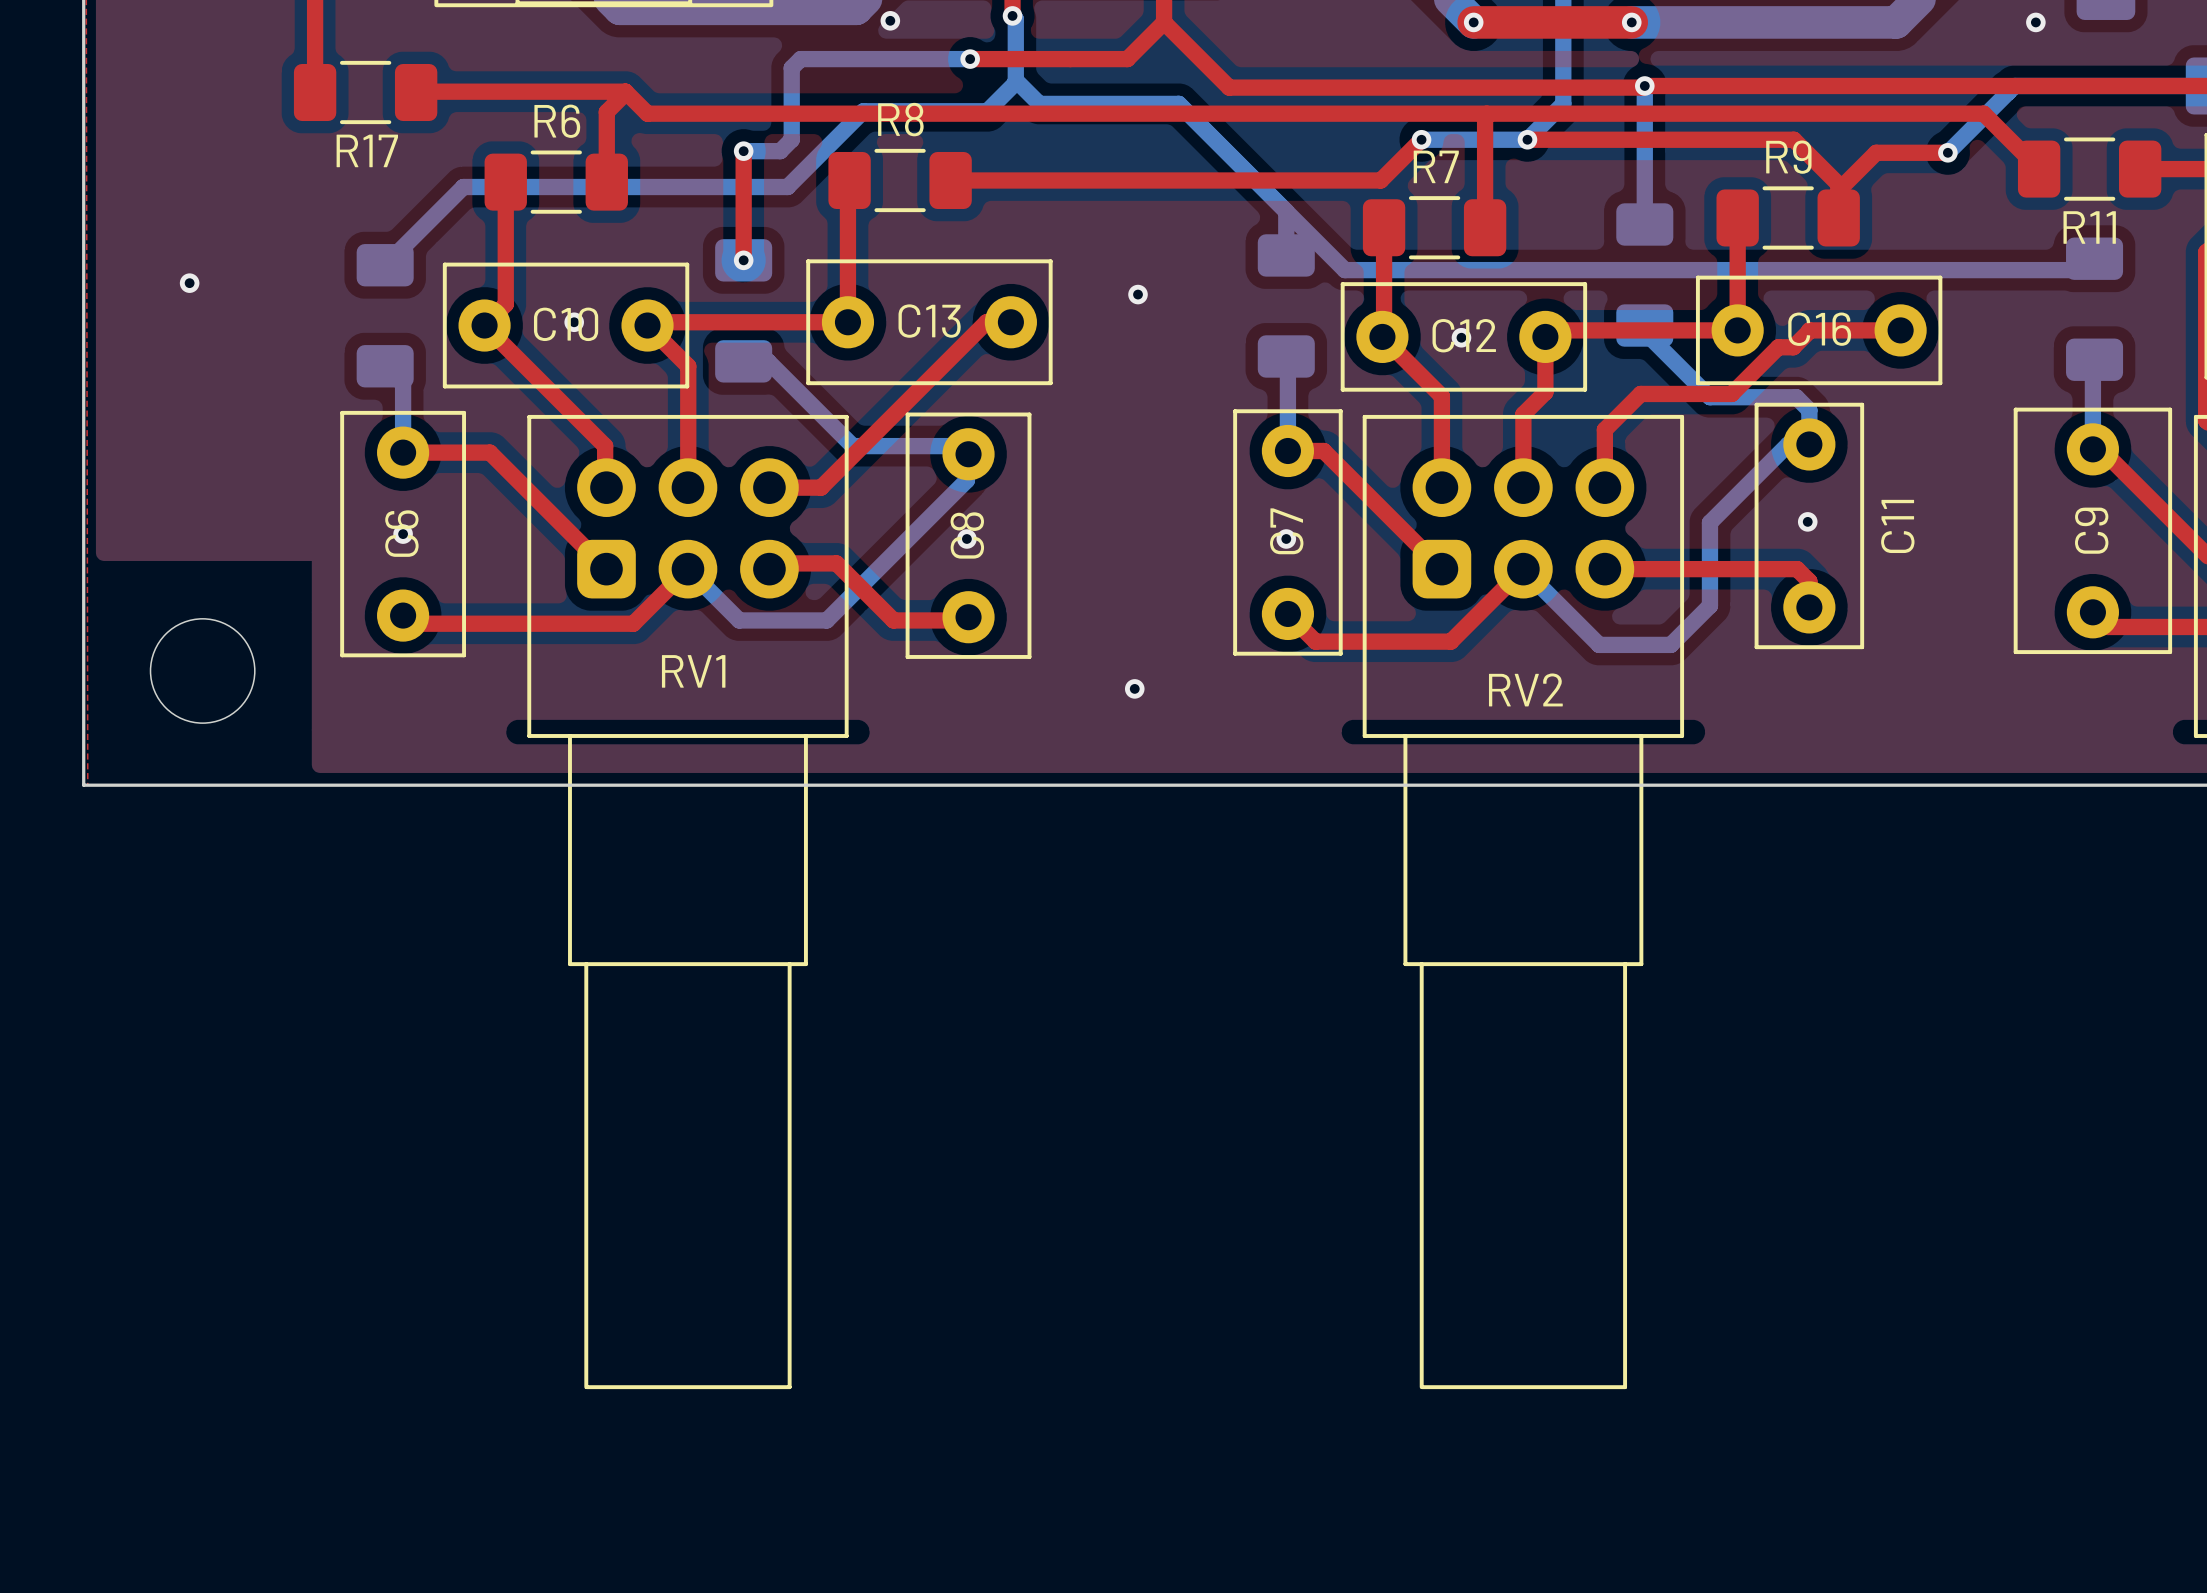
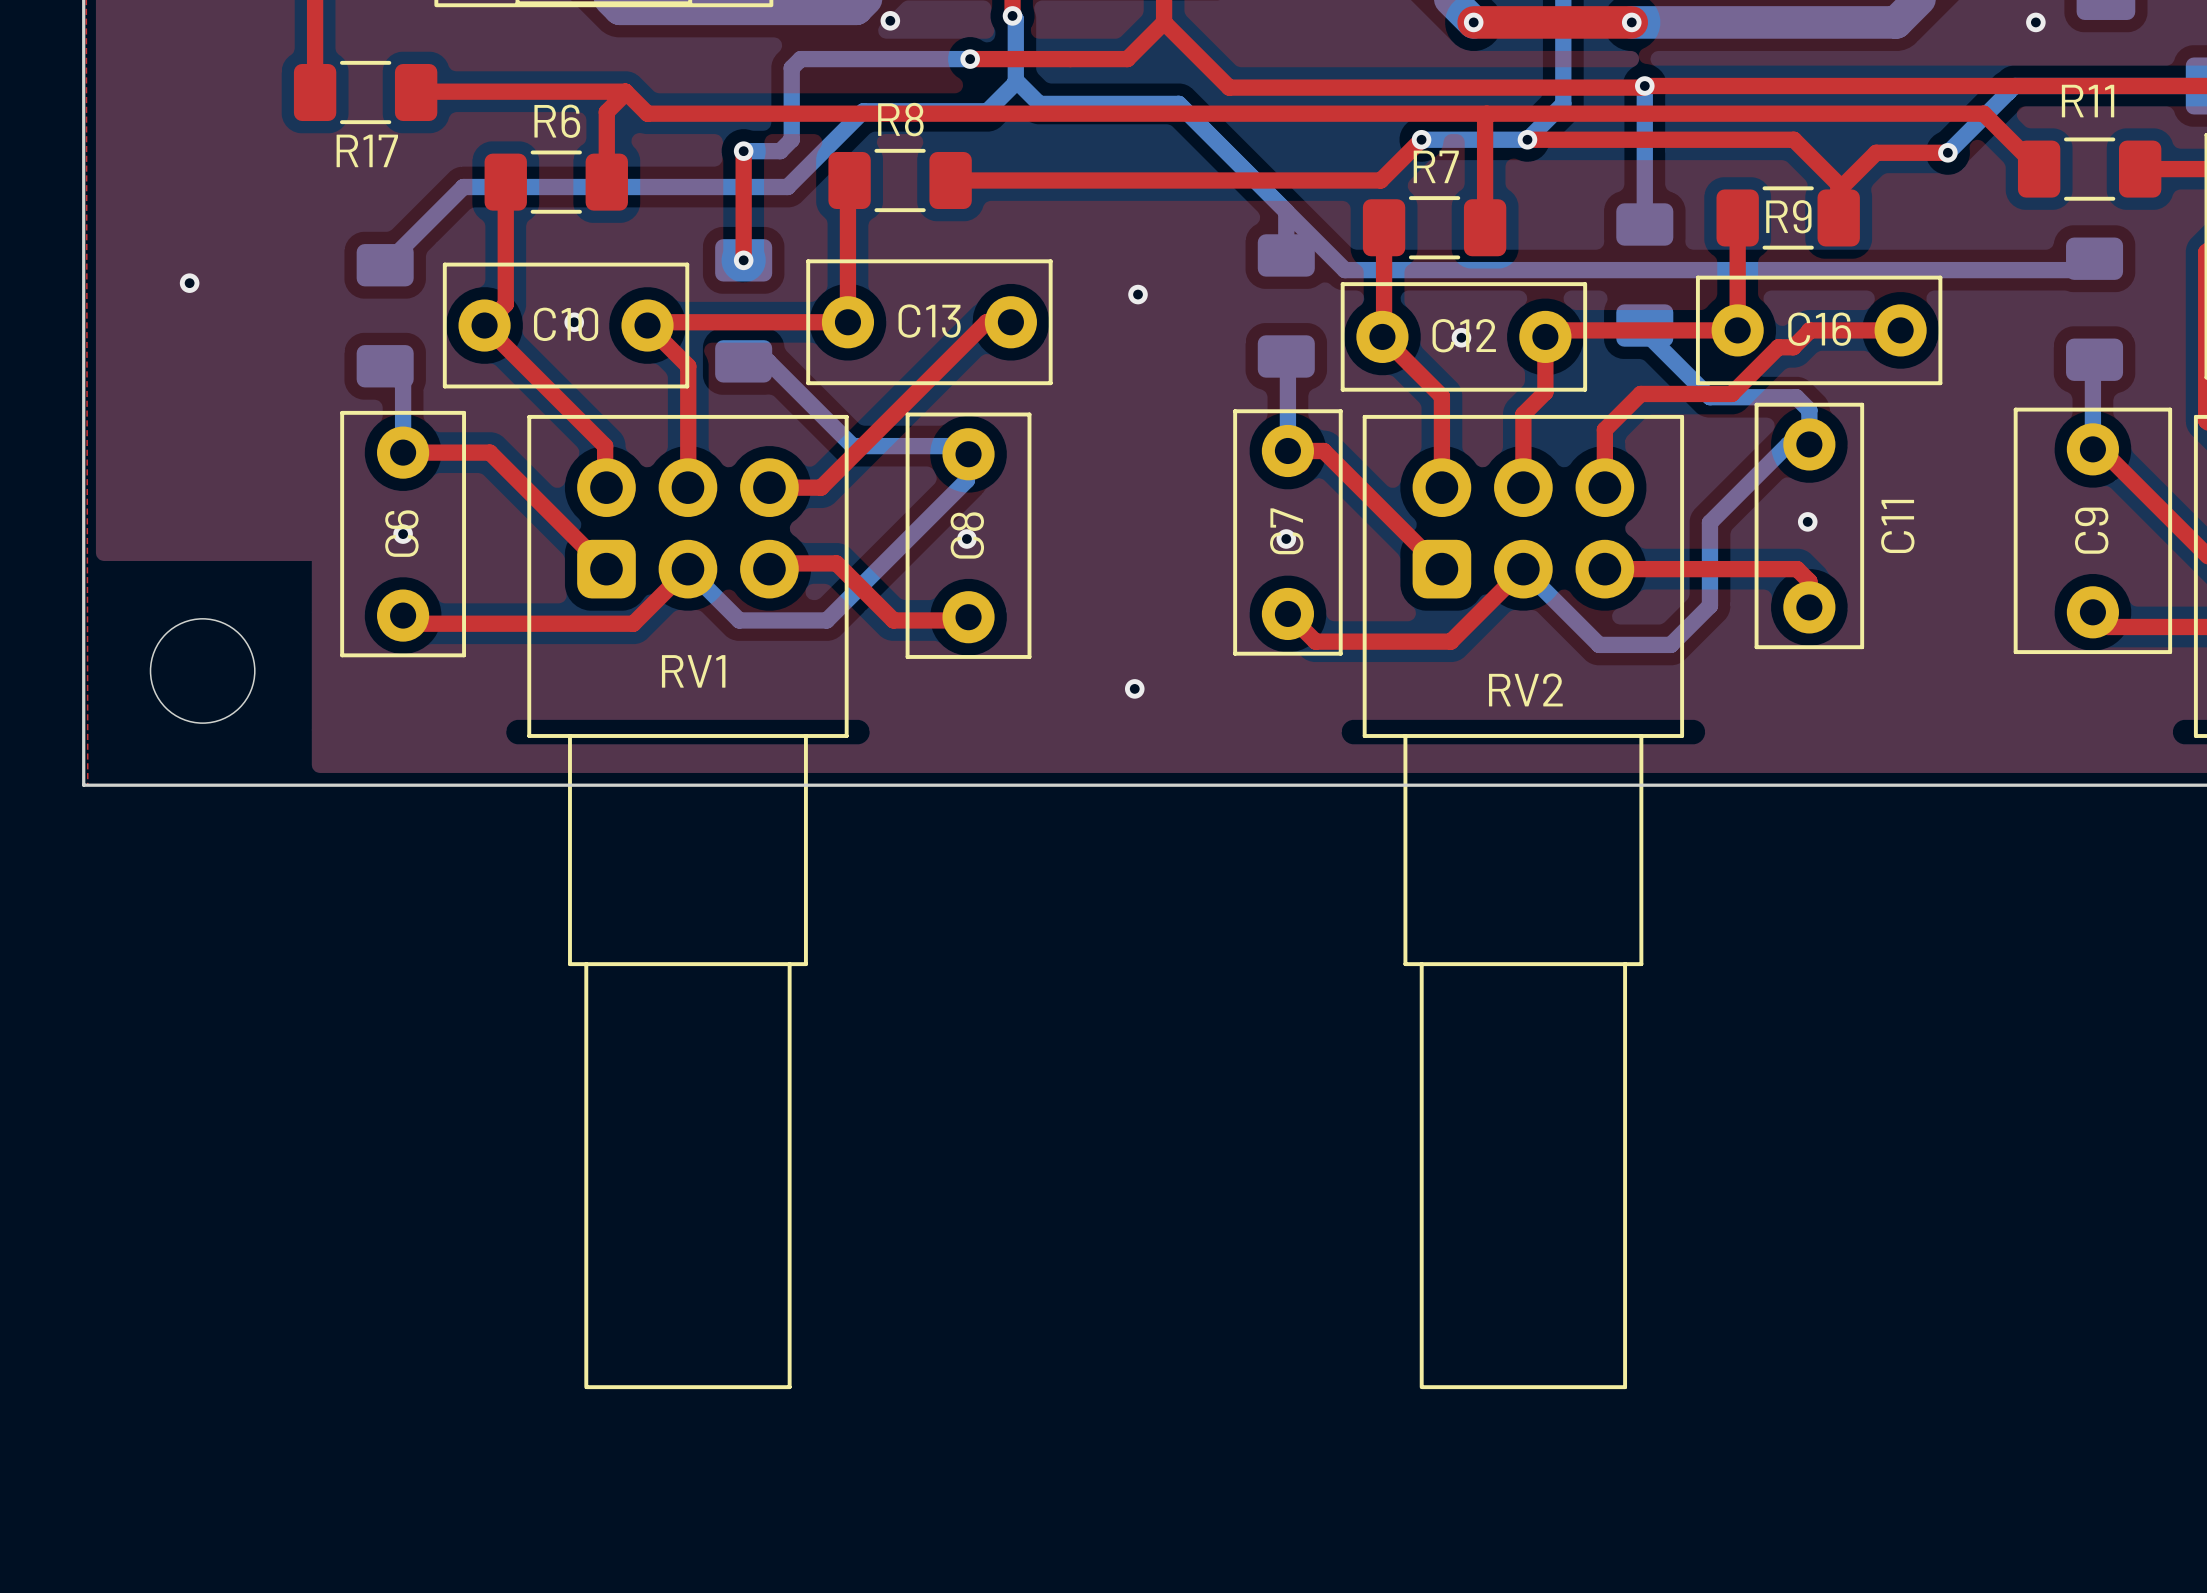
R9 name position: R9 (1788, 157) -> R9 (1788, 216)
R11 name position: R11 (2089, 227) -> R11 (2088, 101)

